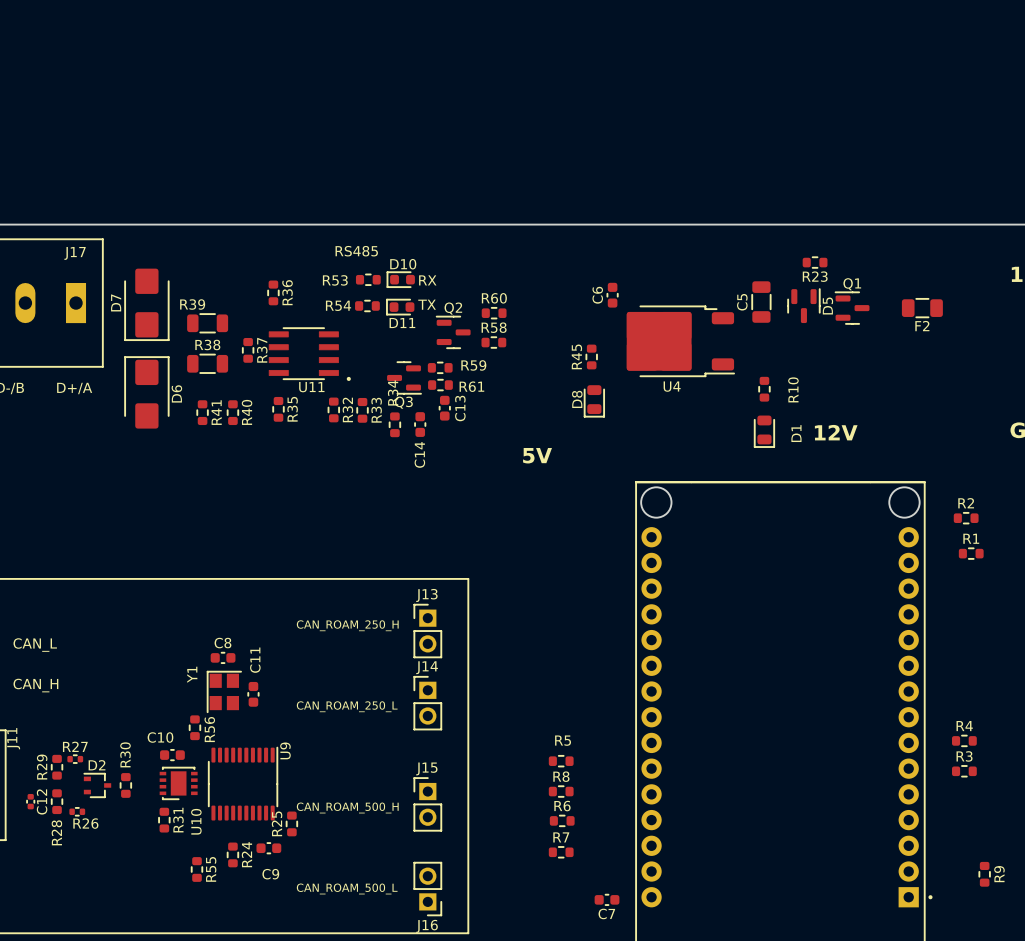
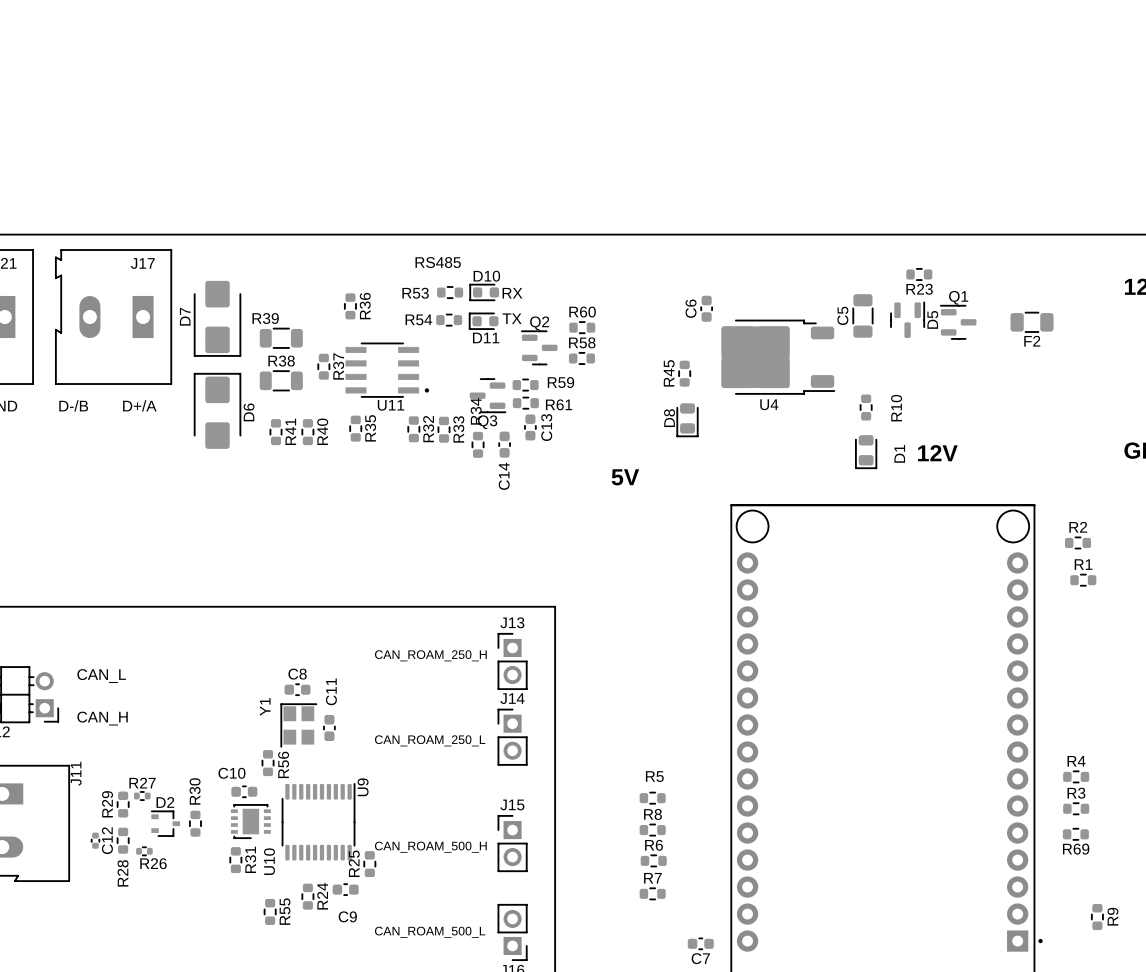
U11 footprint: [268, 327, 351, 381] -> [345, 342, 430, 398]
R69: none -> (1075, 834)

